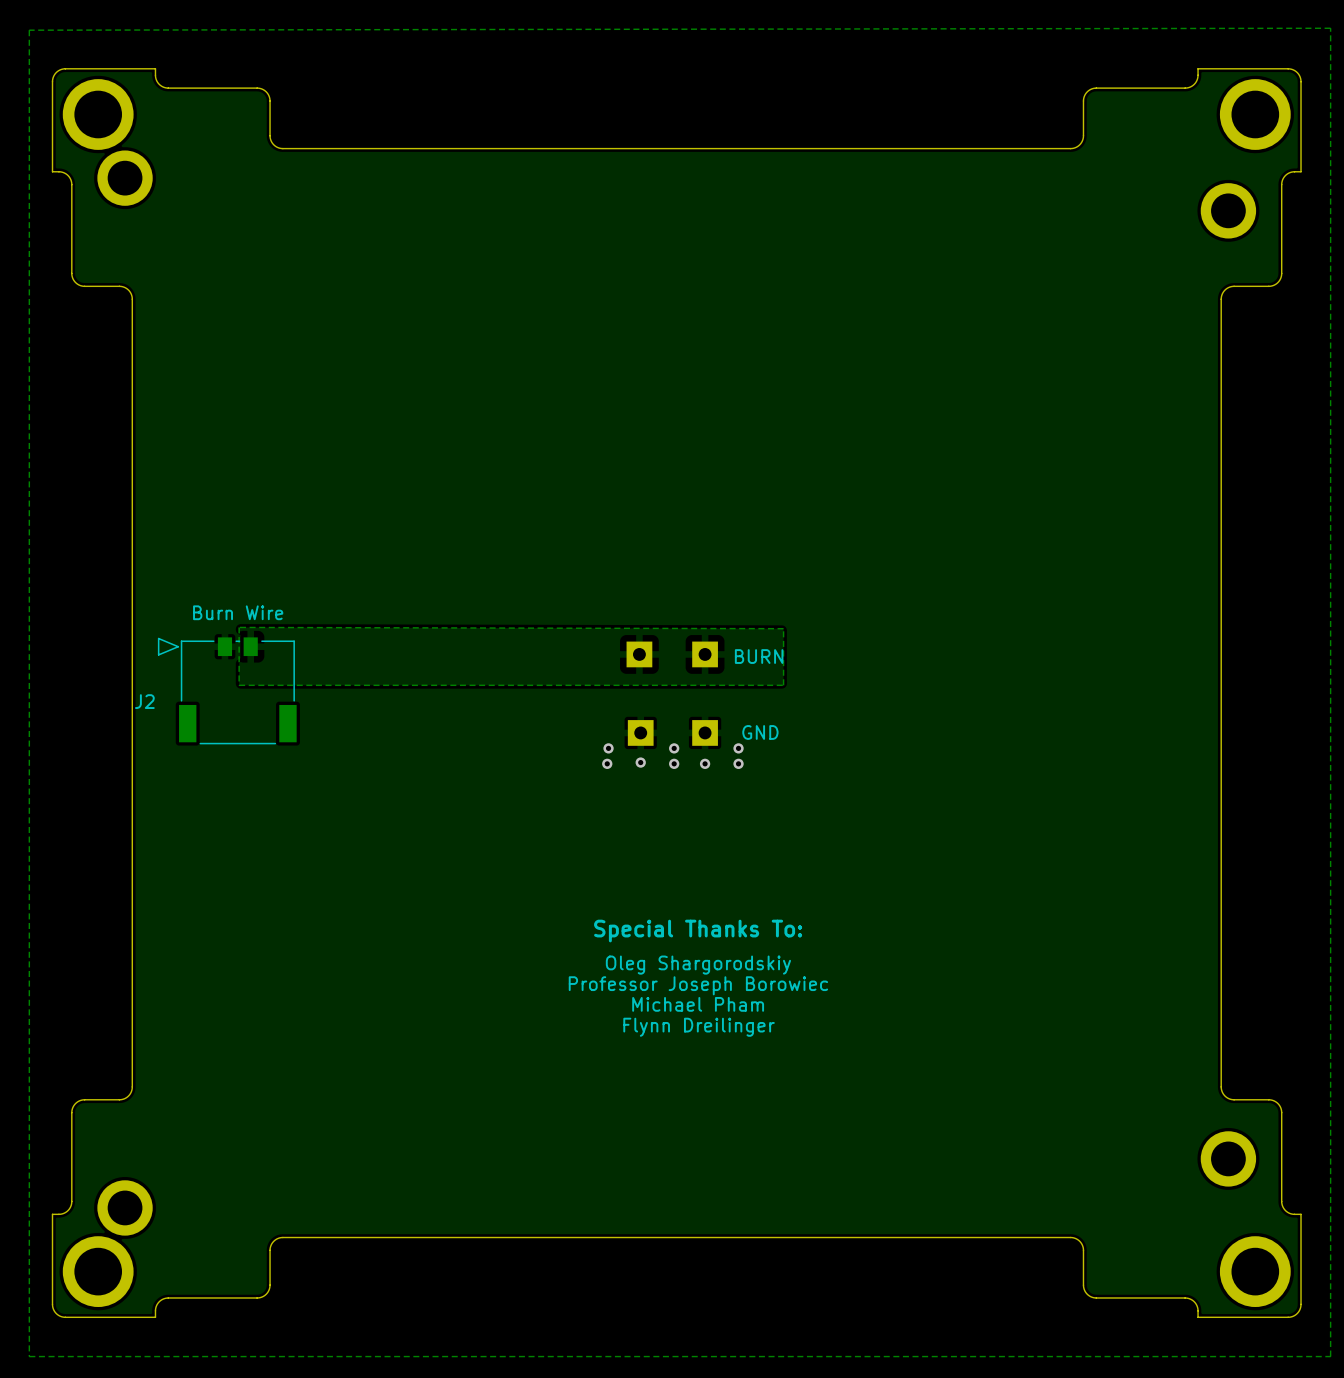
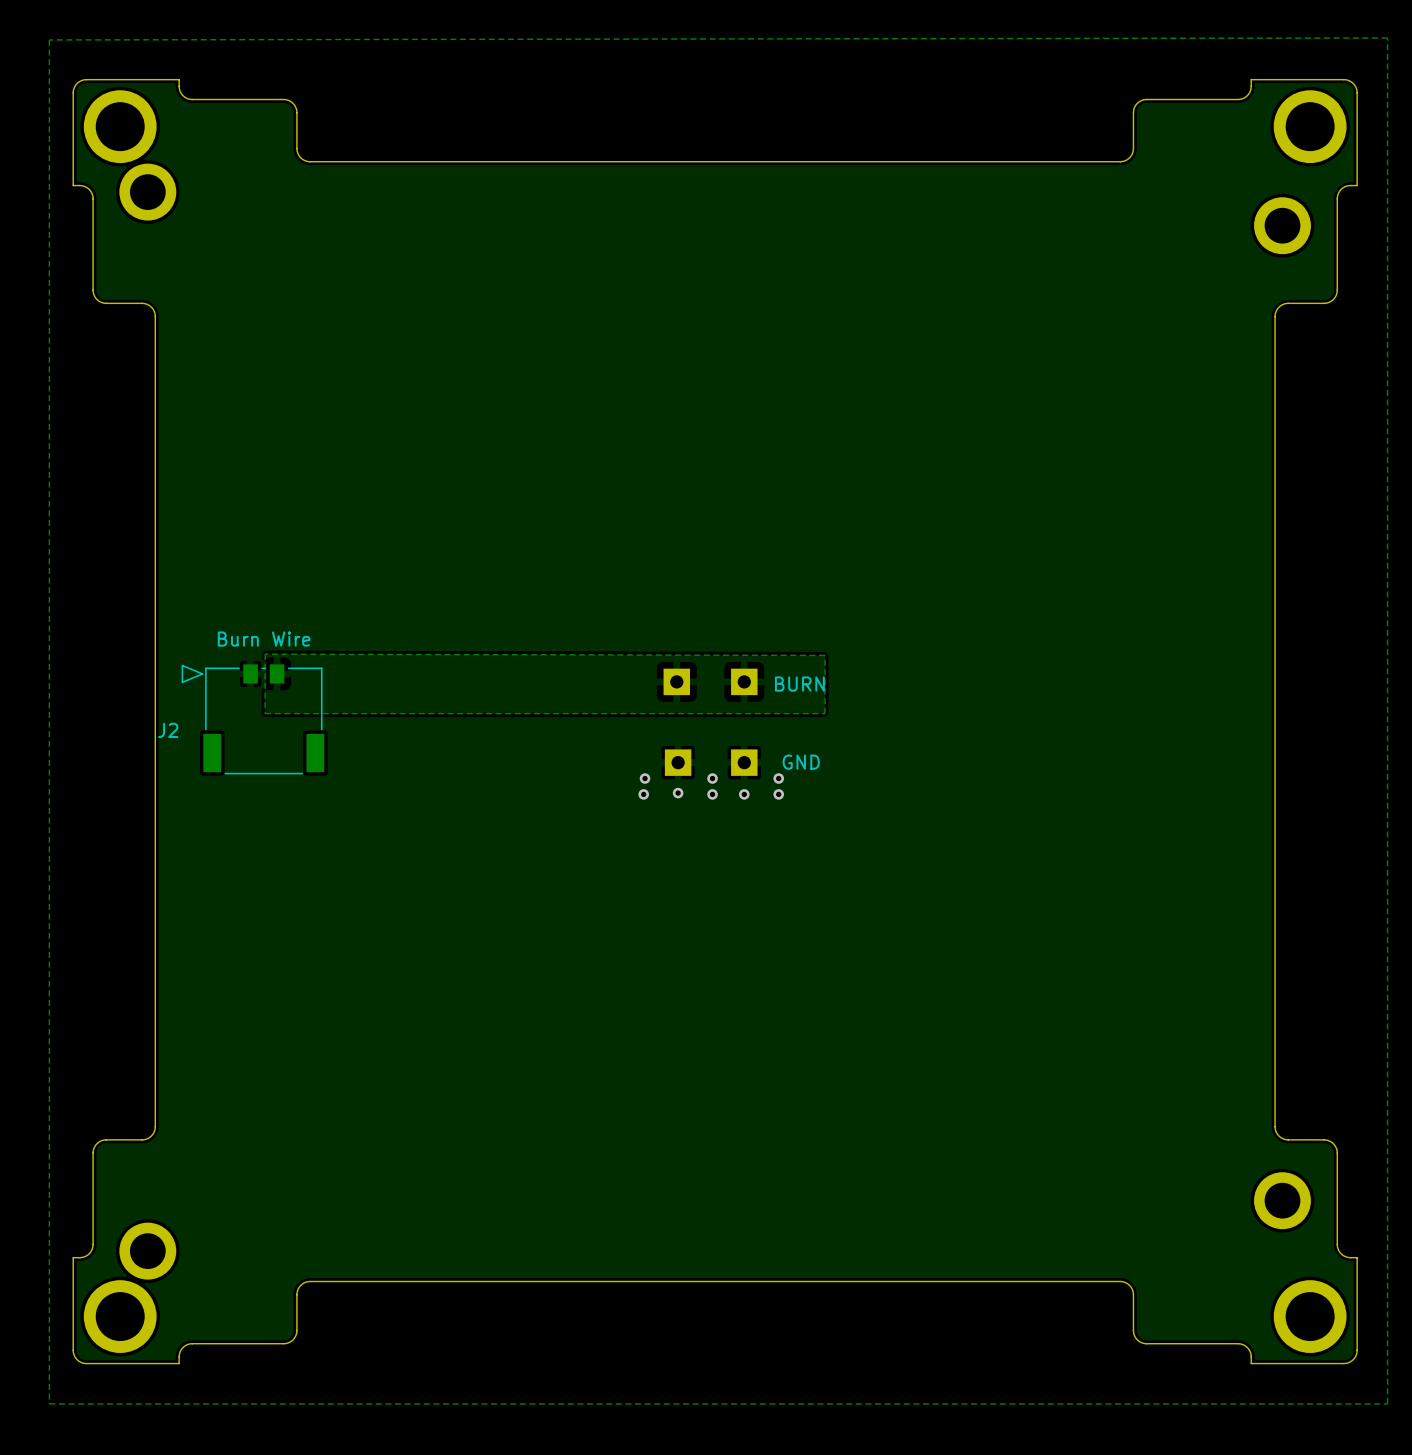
text: Special Thanks To: (698, 931) -> none
text: Oleg Shargorodskiy (698, 965) -> none
text: Professor Joseph Borowiec (698, 985) -> none
text: Michael Pham (698, 1004) -> none
text: Flynn Dreilinger (699, 1027) -> none

